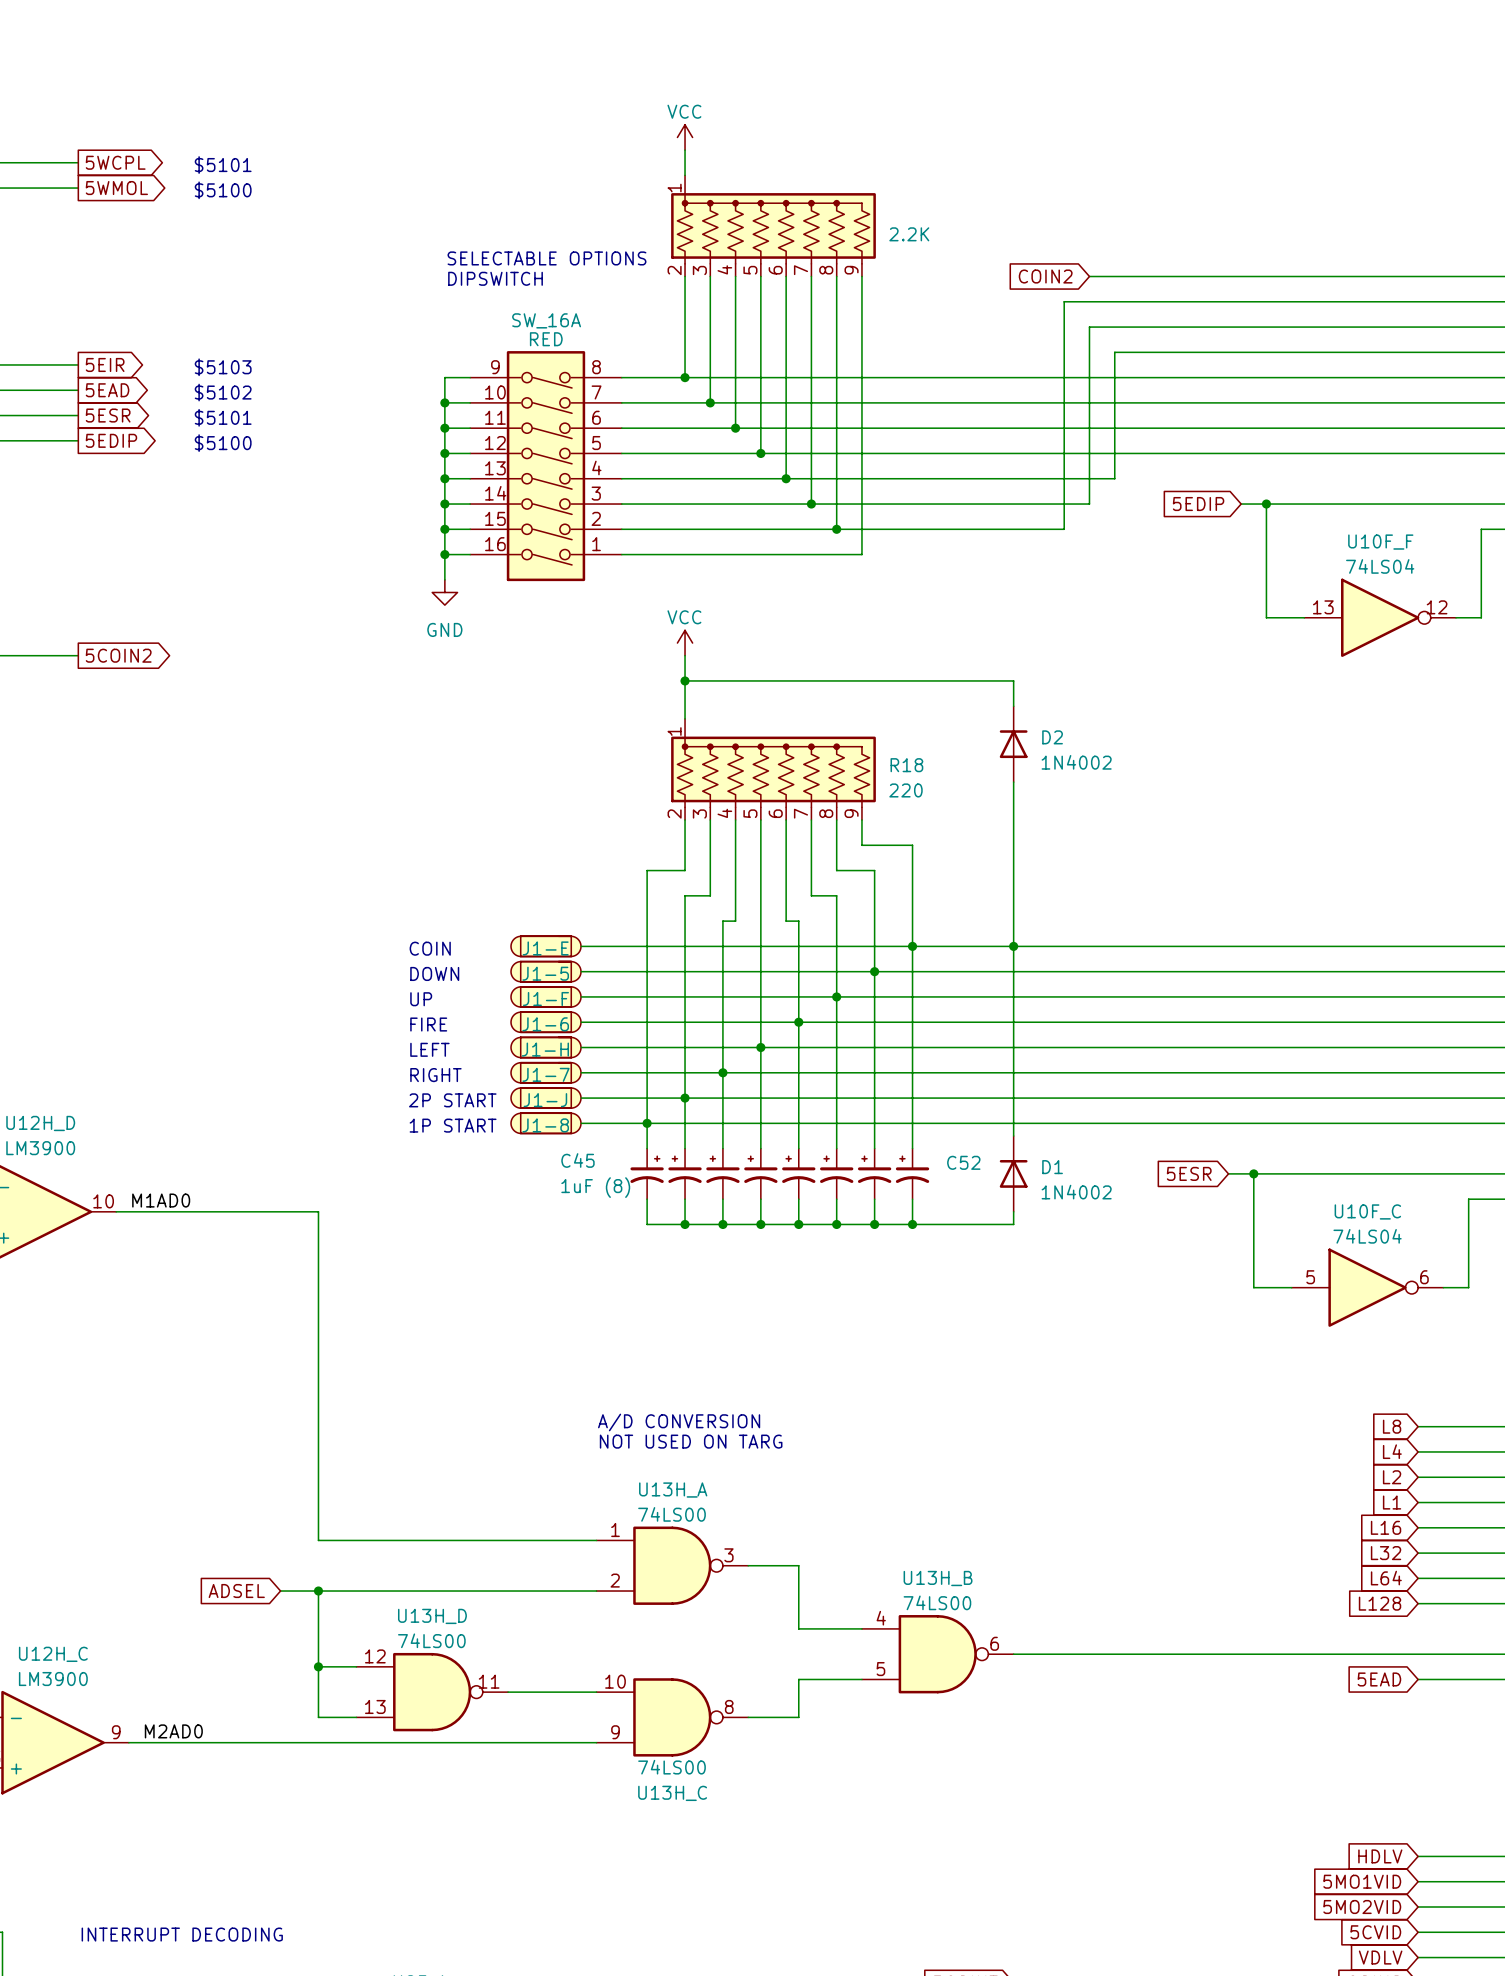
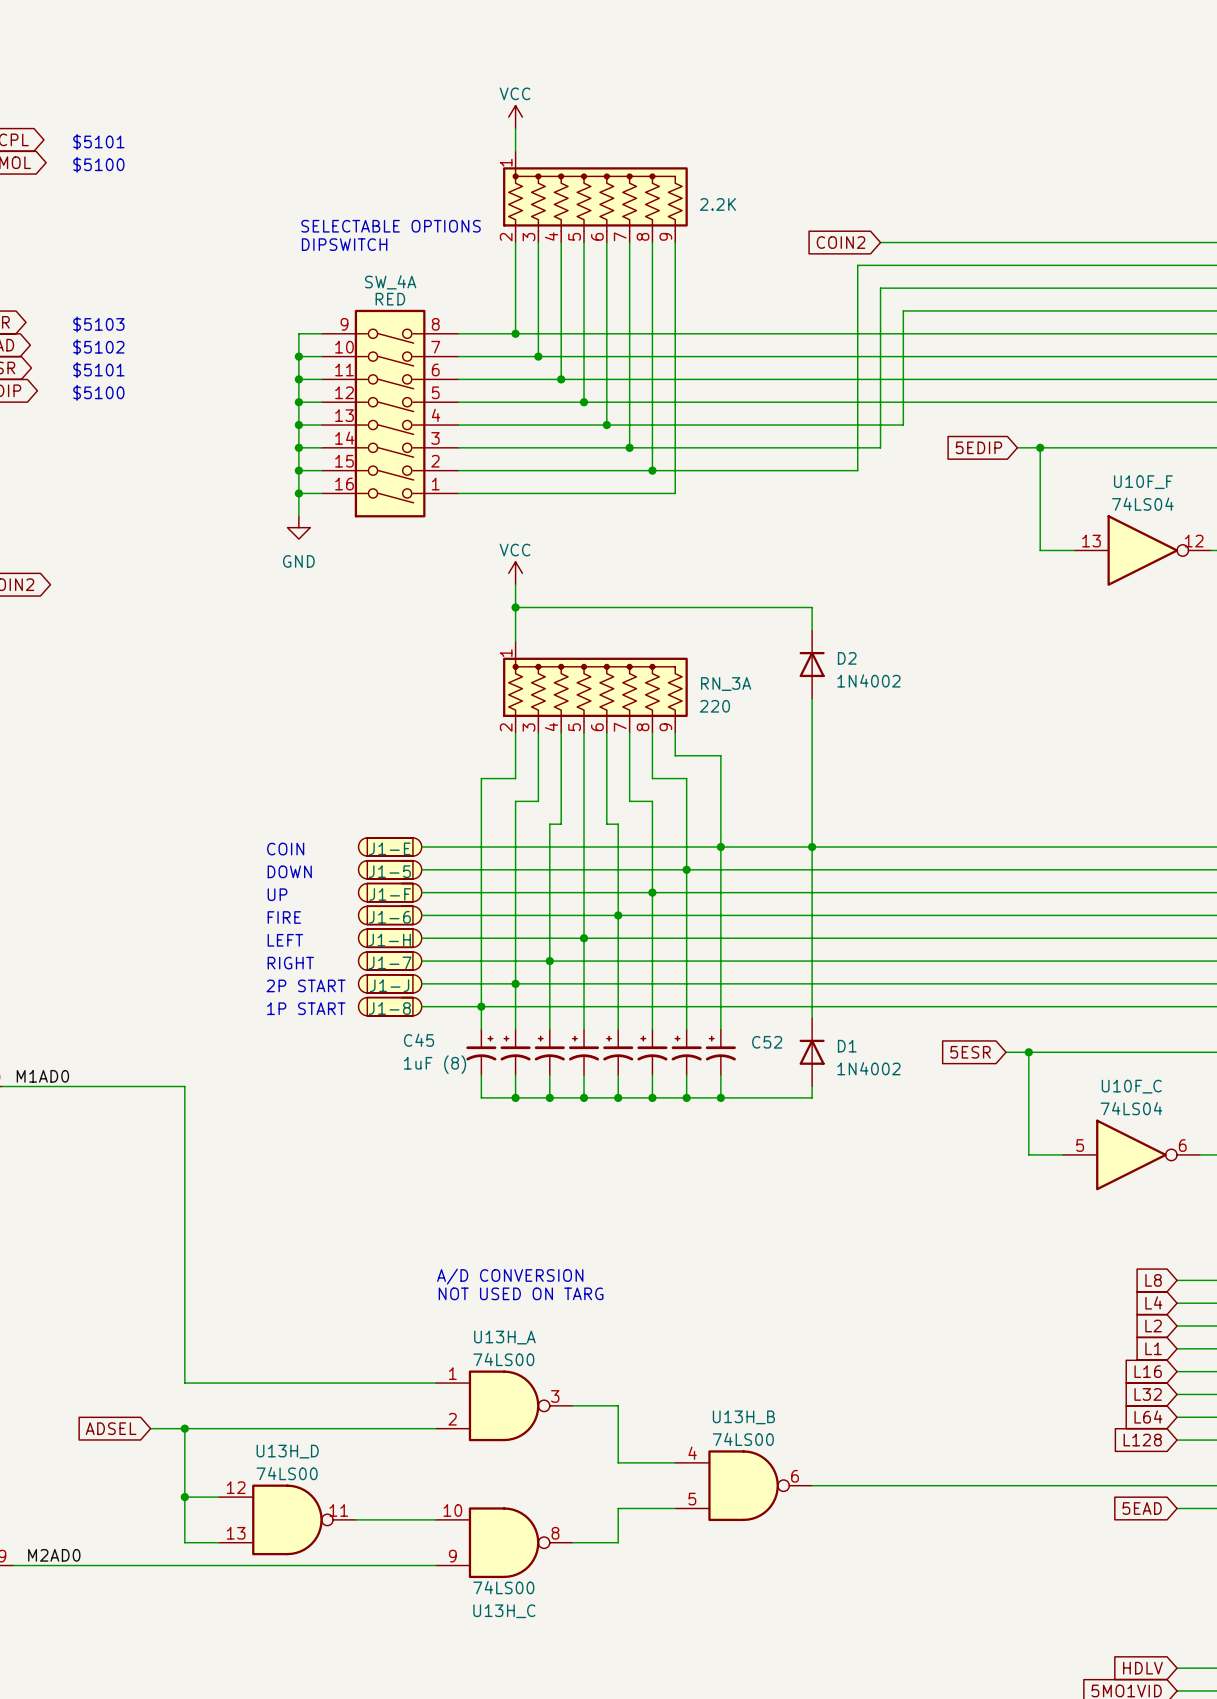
SW_16A name: SW_16A (546, 320) -> SW_4A (390, 282)
R18 name: R18 (906, 765) -> RN_3A (726, 684)

